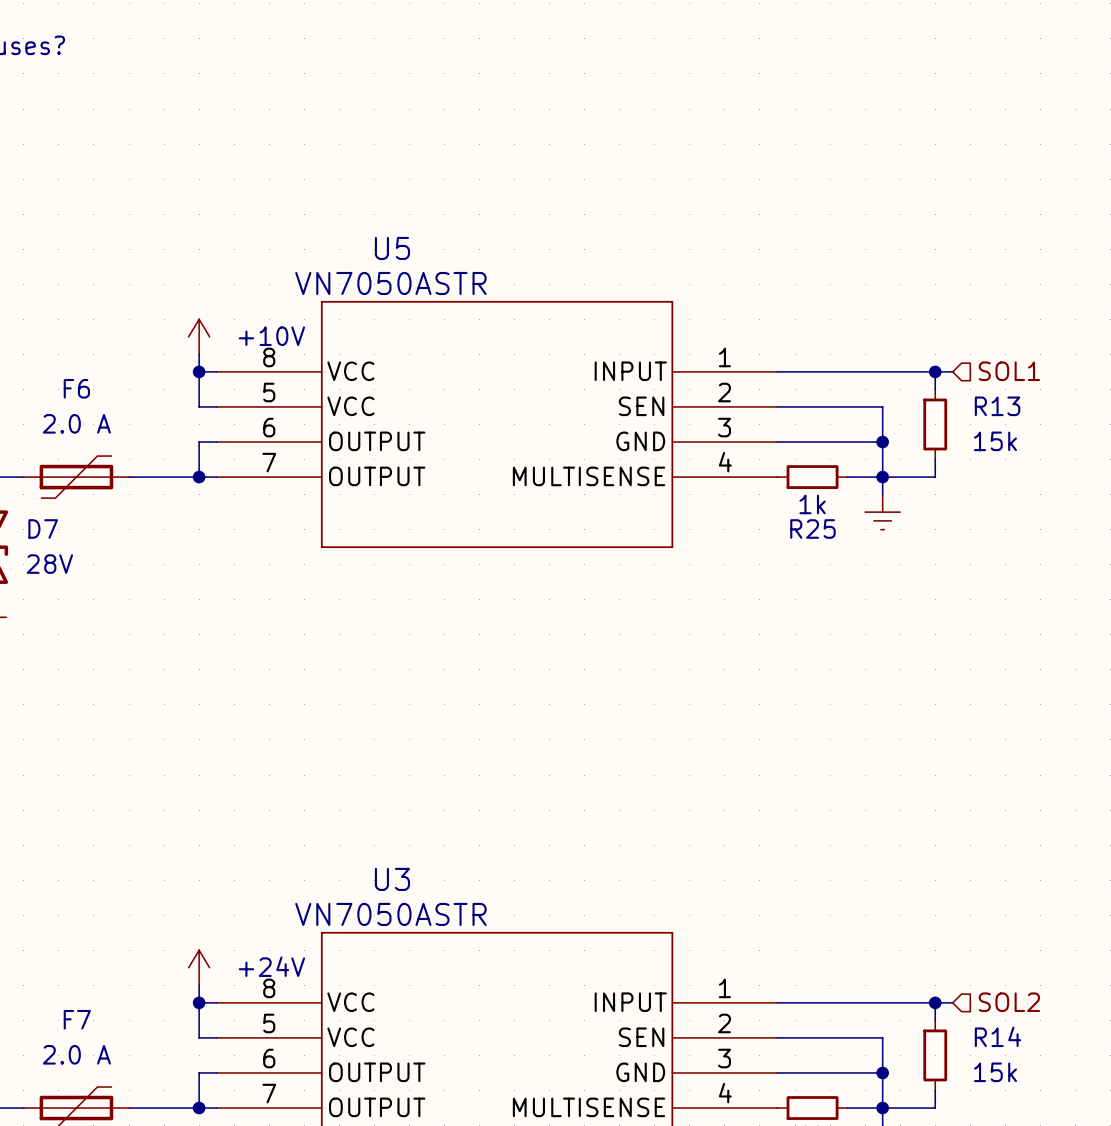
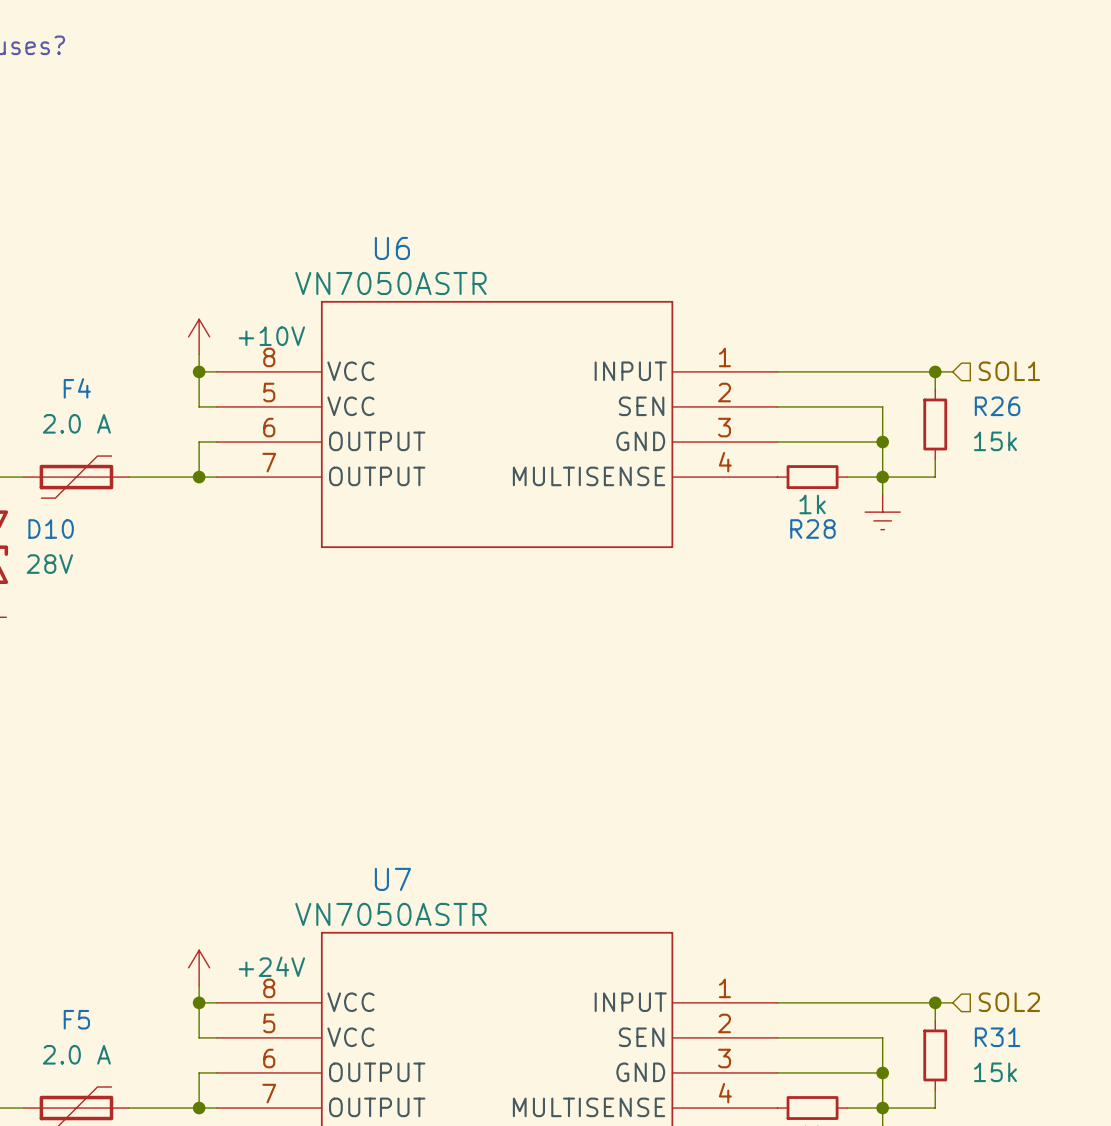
U5 name: U5 (392, 248) -> U6 (392, 248)
F6 name: F6 (76, 388) -> F4 (77, 388)
R13 name: R13 (997, 406) -> R26 (997, 406)
D7 name: D7 (43, 528) -> D10 (51, 528)
R25 name: R25 (812, 528) -> R28 (812, 528)
U3 name: U3 (392, 879) -> U7 (392, 879)
F7 name: F7 (77, 1019) -> F5 (76, 1019)
R14 name: R14 (997, 1036) -> R31 (997, 1037)

